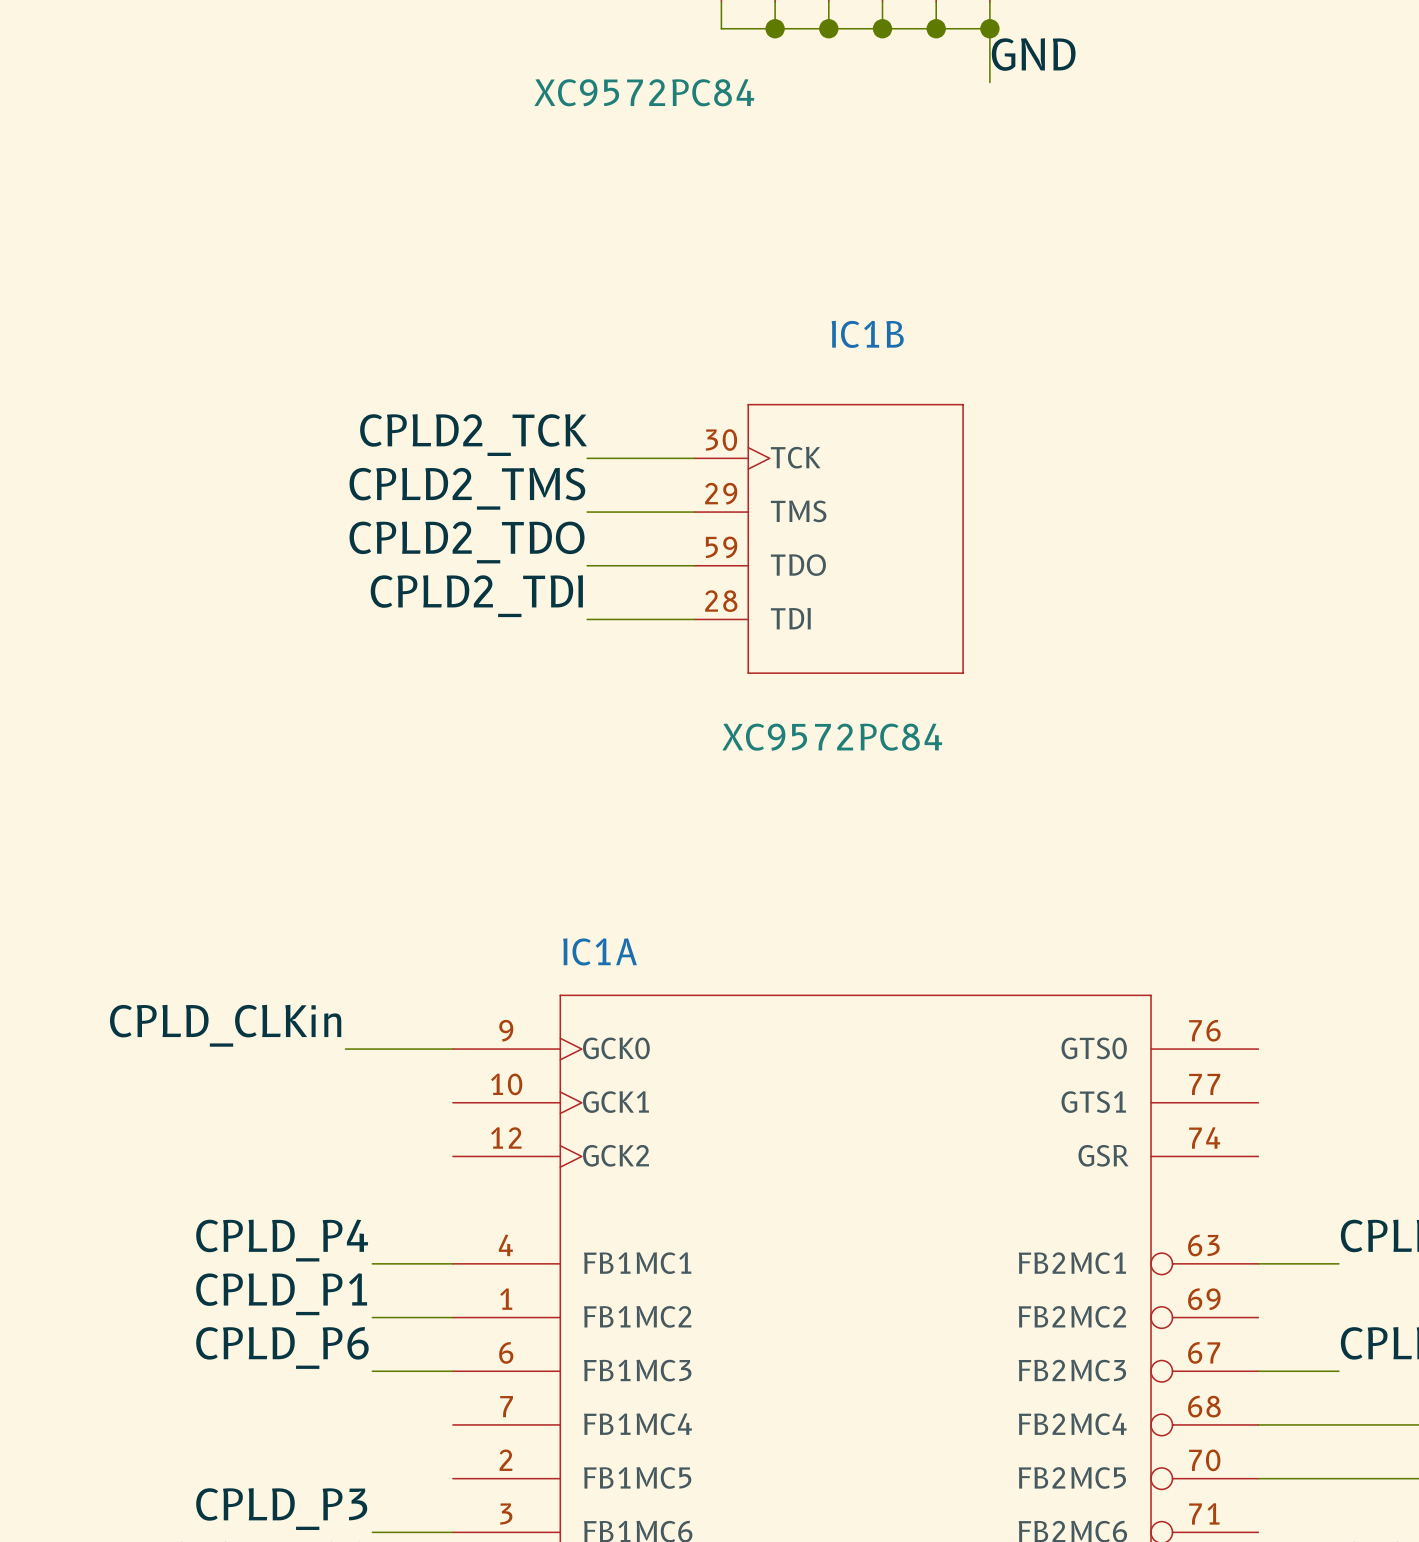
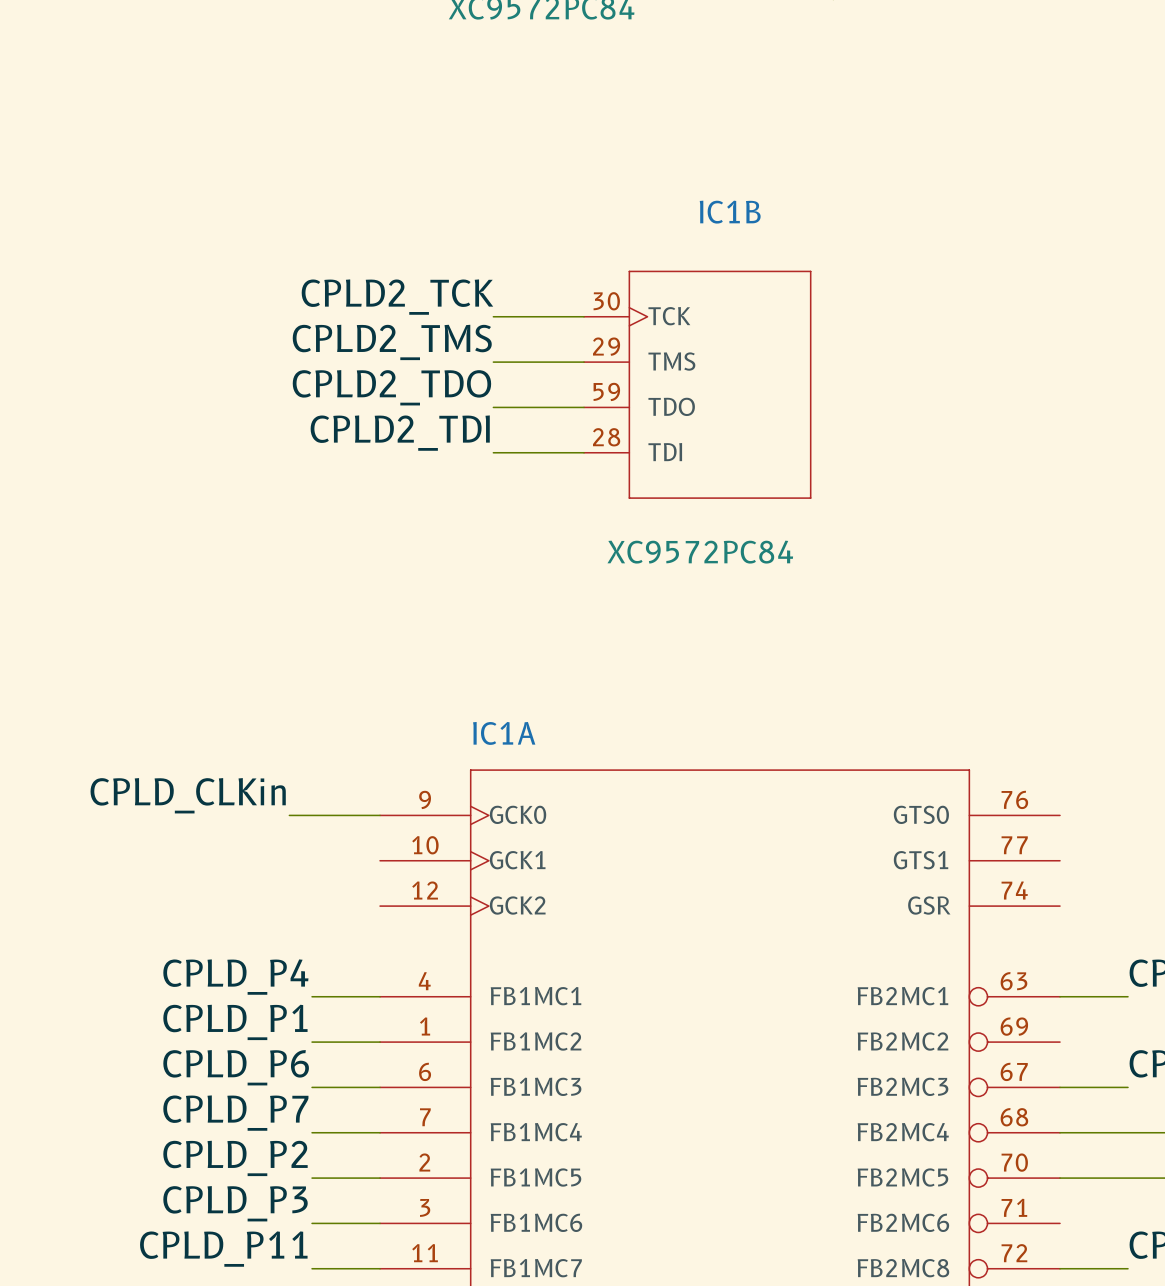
label: none -> CPLD_P7 (235, 1113)
wire: none -> (312, 1132) (380, 1132)
label: none -> CPLD_P2 (235, 1158)
wire: none -> (312, 1178) (380, 1178)

